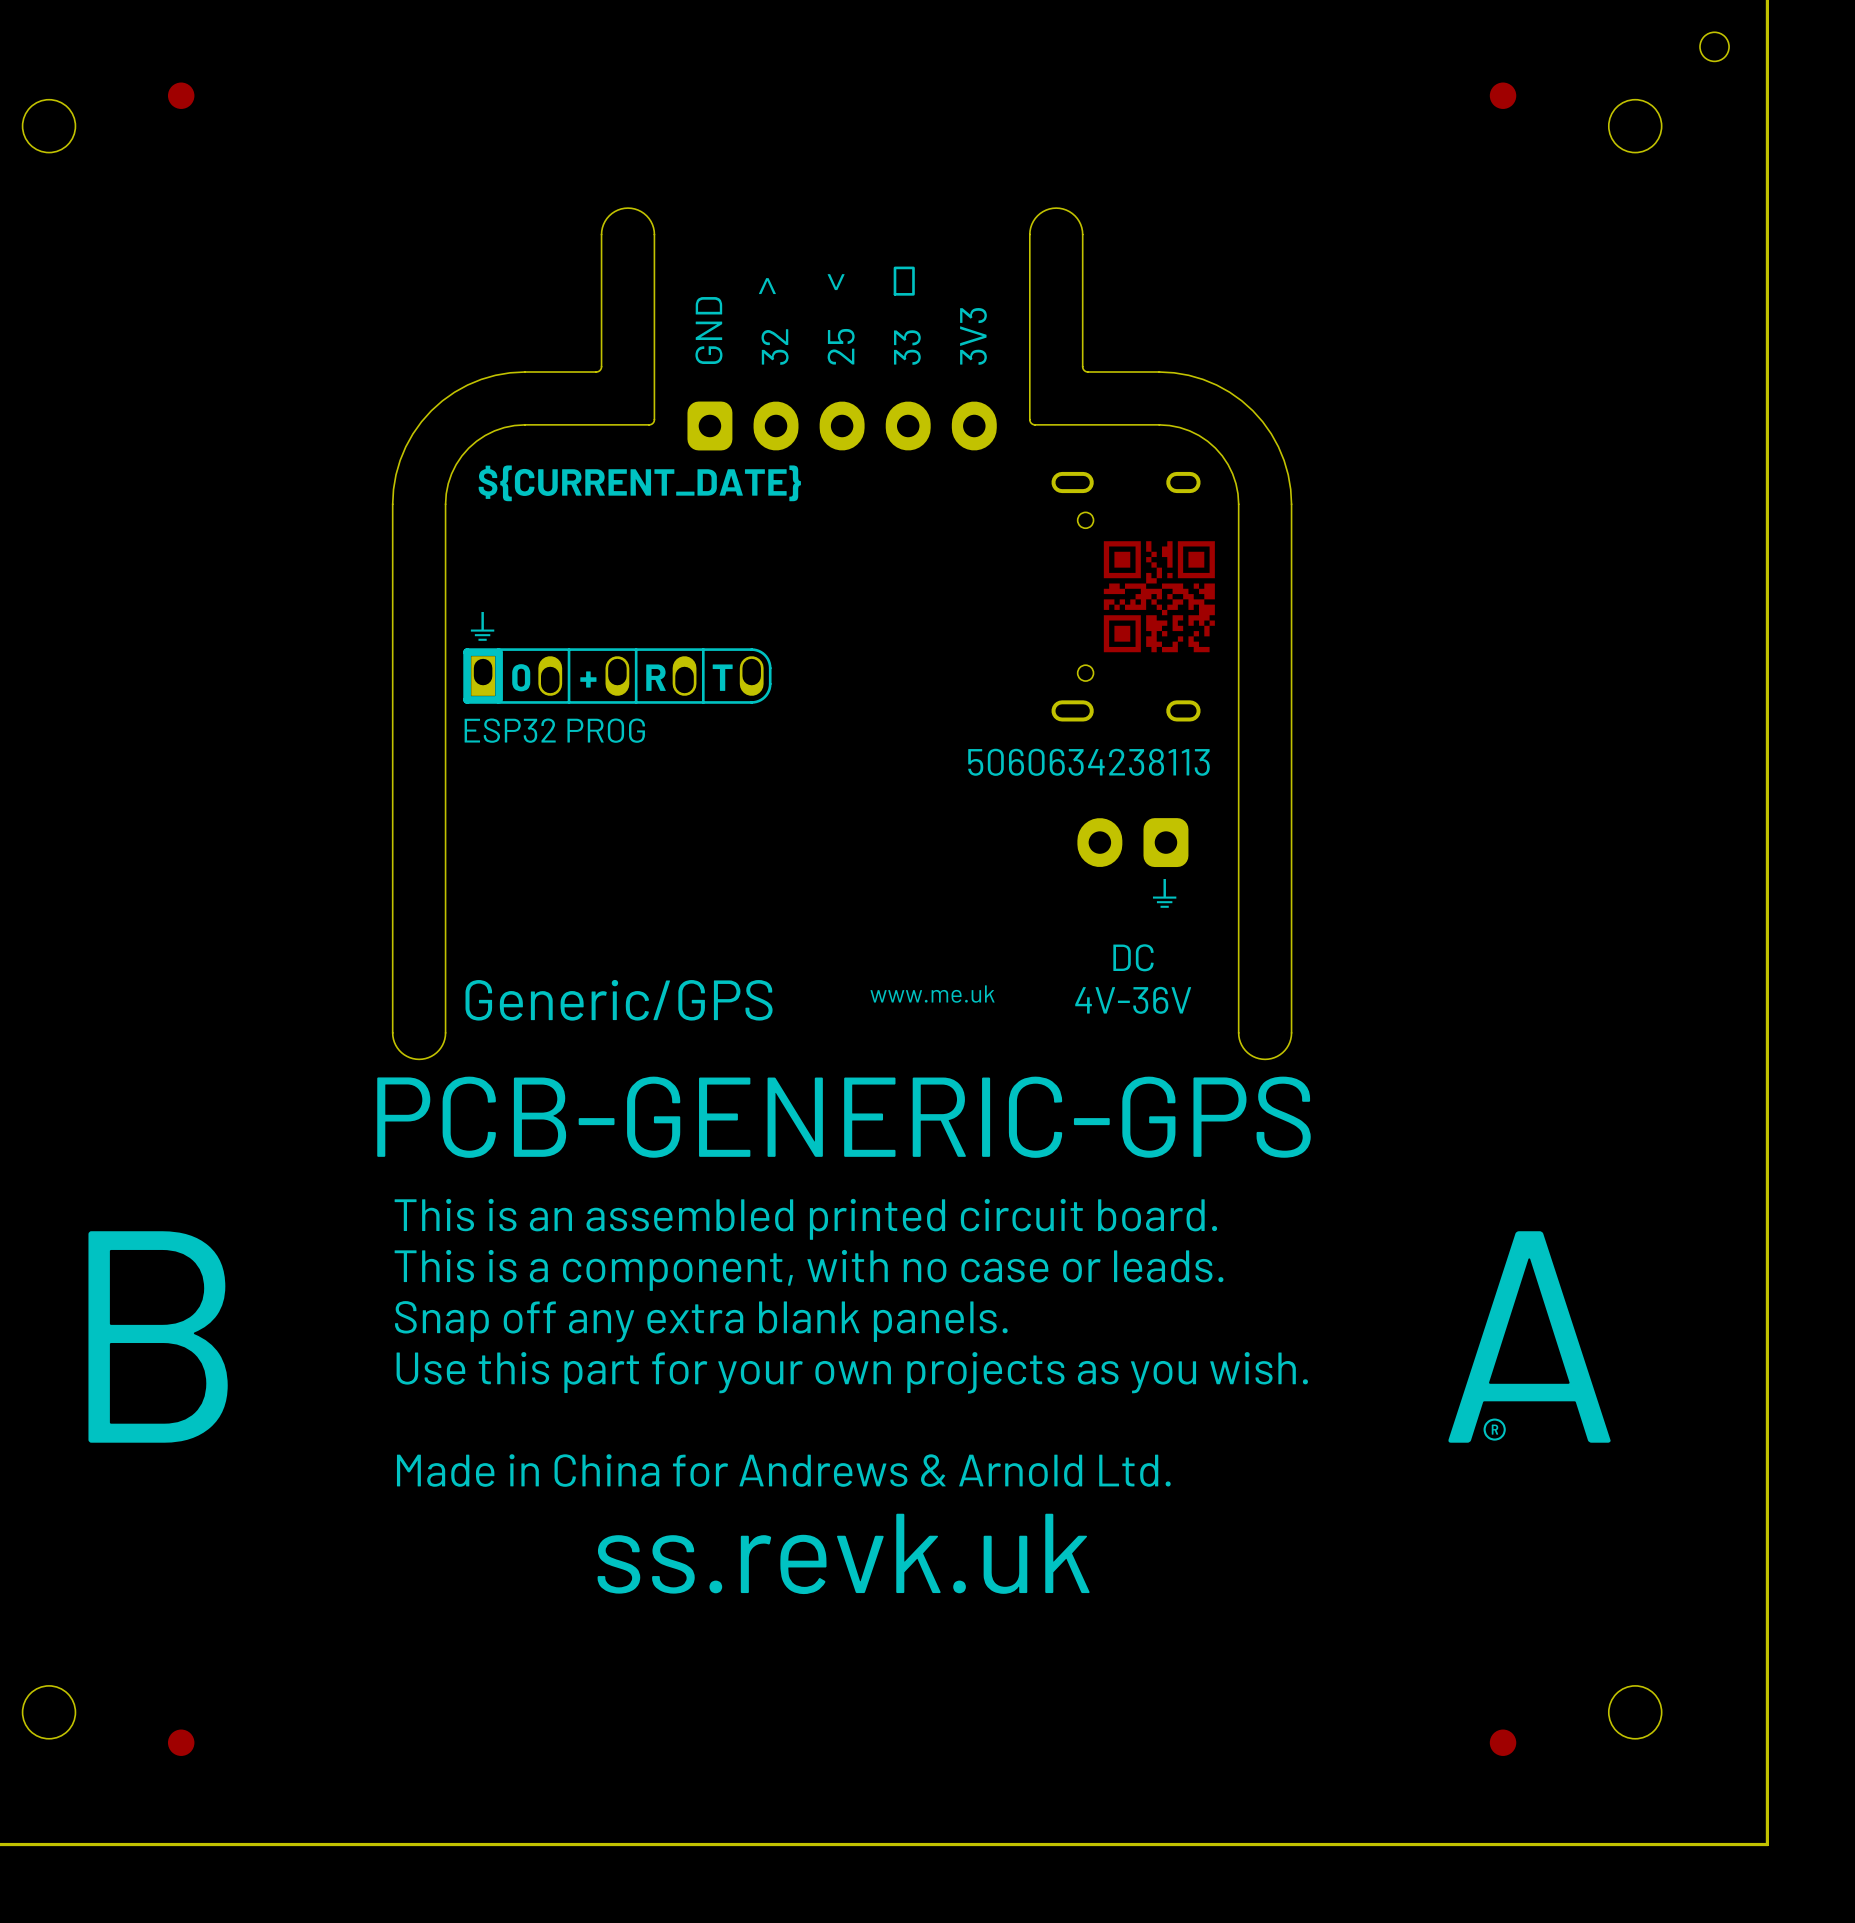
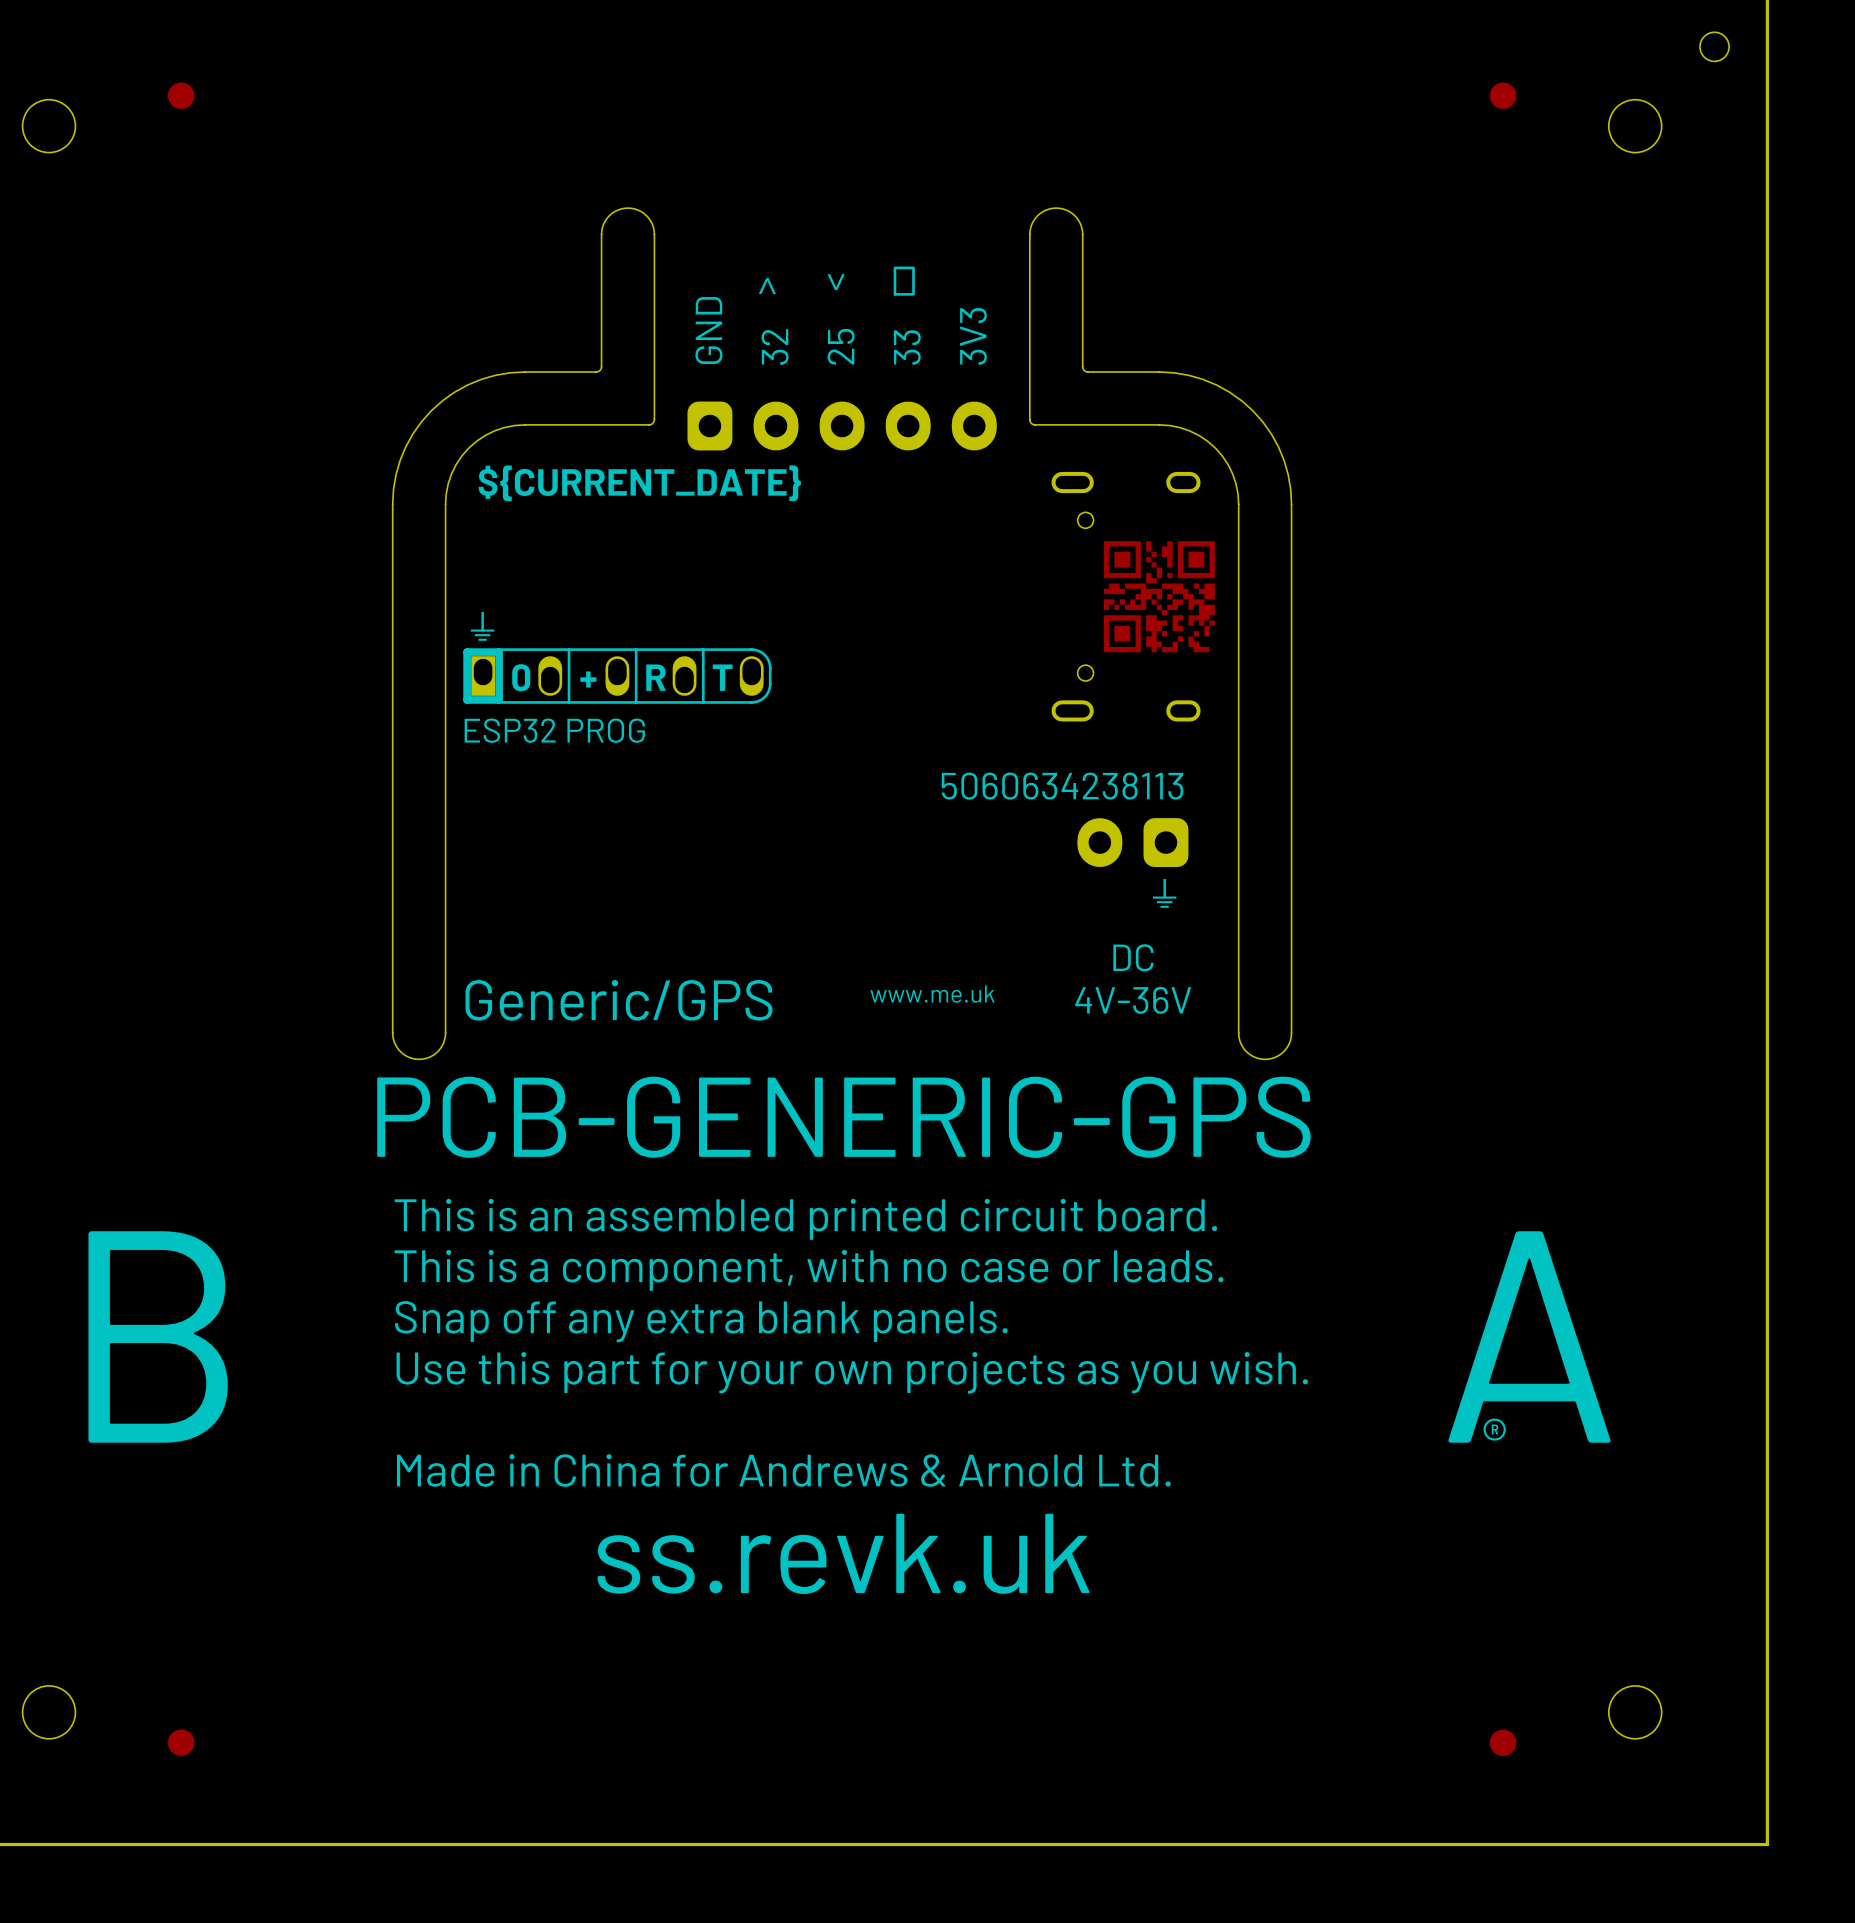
text position: 5060634238113 (1089, 762) -> 5060634238113 (1062, 786)

